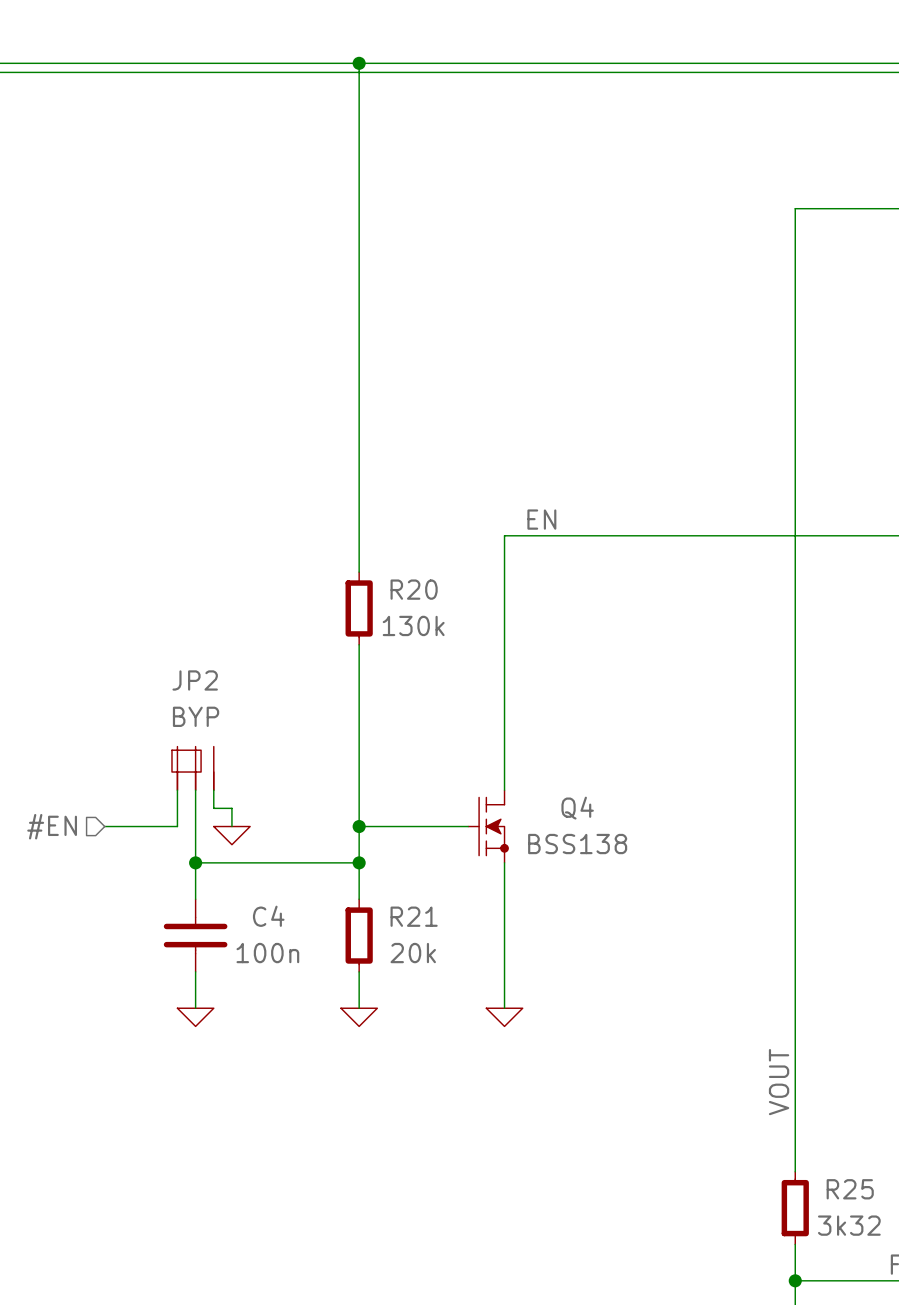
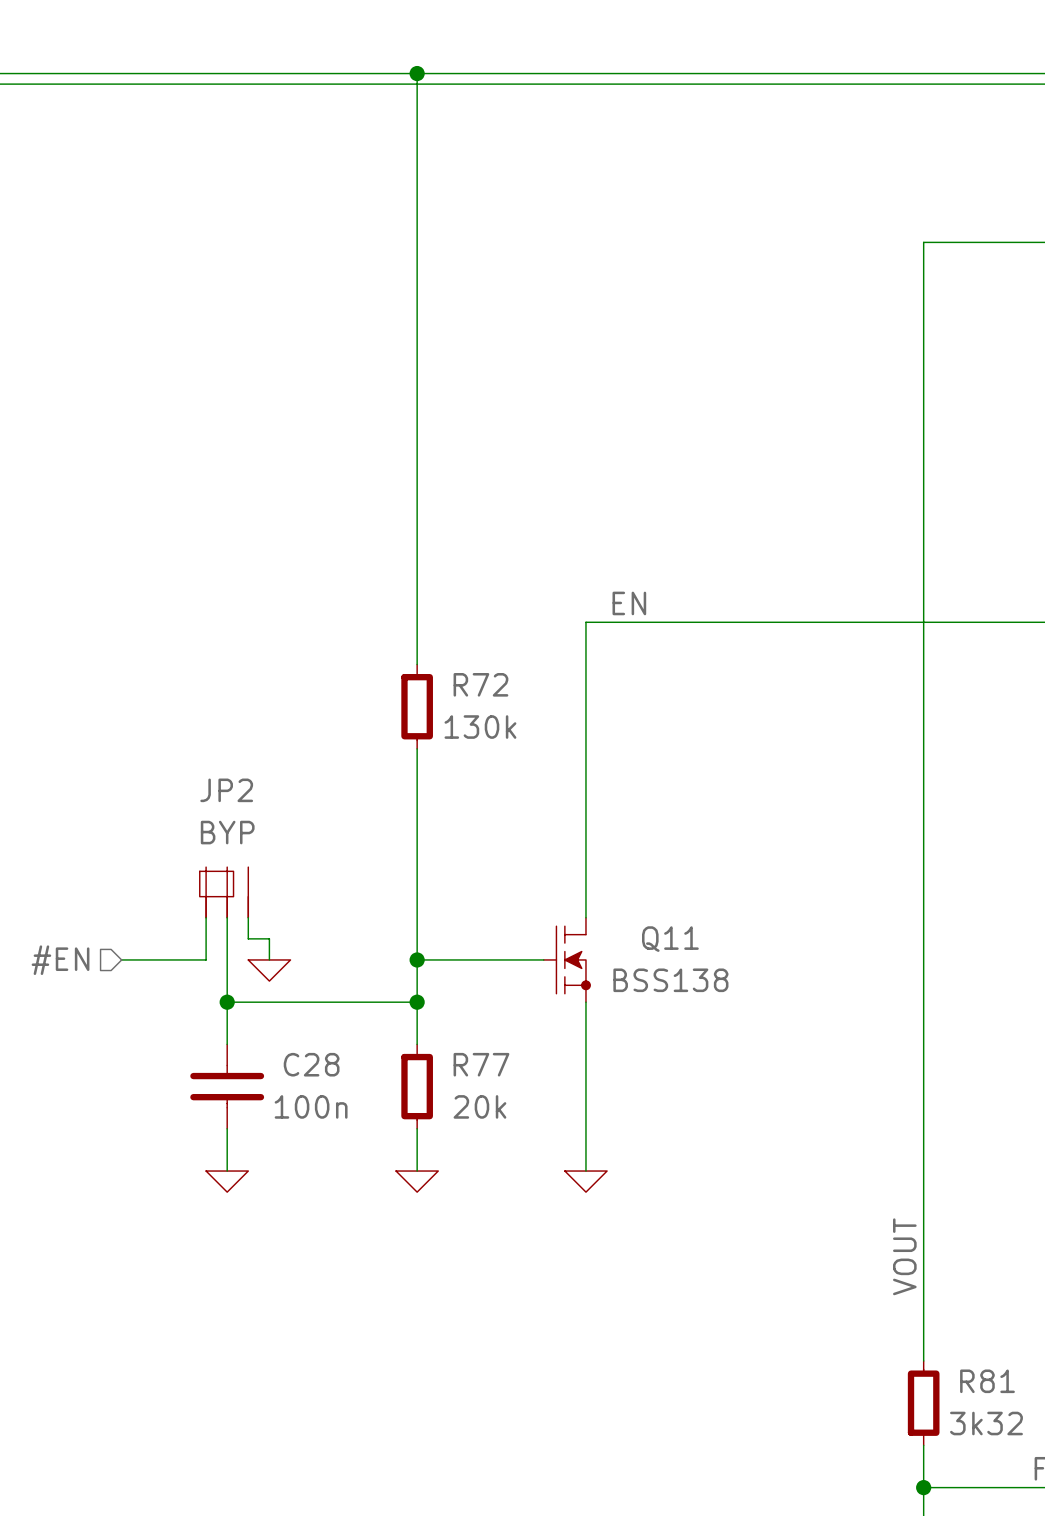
R20 name: R20 (414, 589) -> R72 (480, 684)
Q4 name: Q4 (577, 808) -> Q11 (670, 939)
C4 name: C4 (268, 916) -> C28 (311, 1064)
R21 name: R21 (414, 916) -> R77 (481, 1064)
R25 name: R25 (850, 1189) -> R81 (987, 1381)

